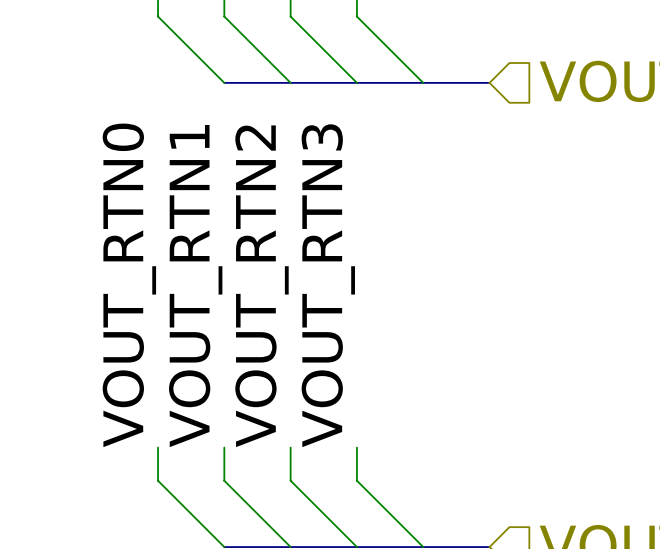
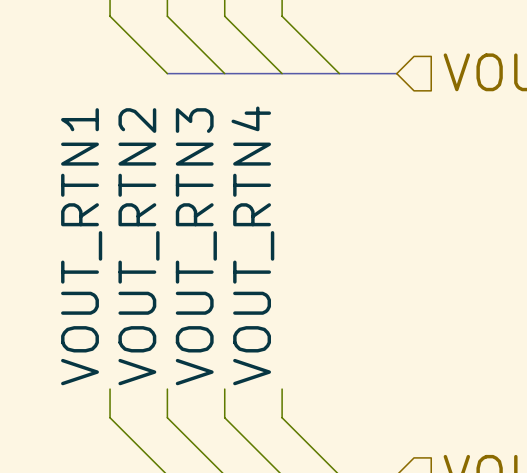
label: VOUT_RTN0 (129, 285) -> VOUT_RTN1 (81, 246)
label: VOUT_RTN3 (328, 285) -> VOUT_RTN4 (252, 245)
label: VOUT_RTN1 (195, 286) -> VOUT_RTN2 (139, 246)
label: VOUT_RTN2 (262, 286) -> VOUT_RTN3 (196, 246)

